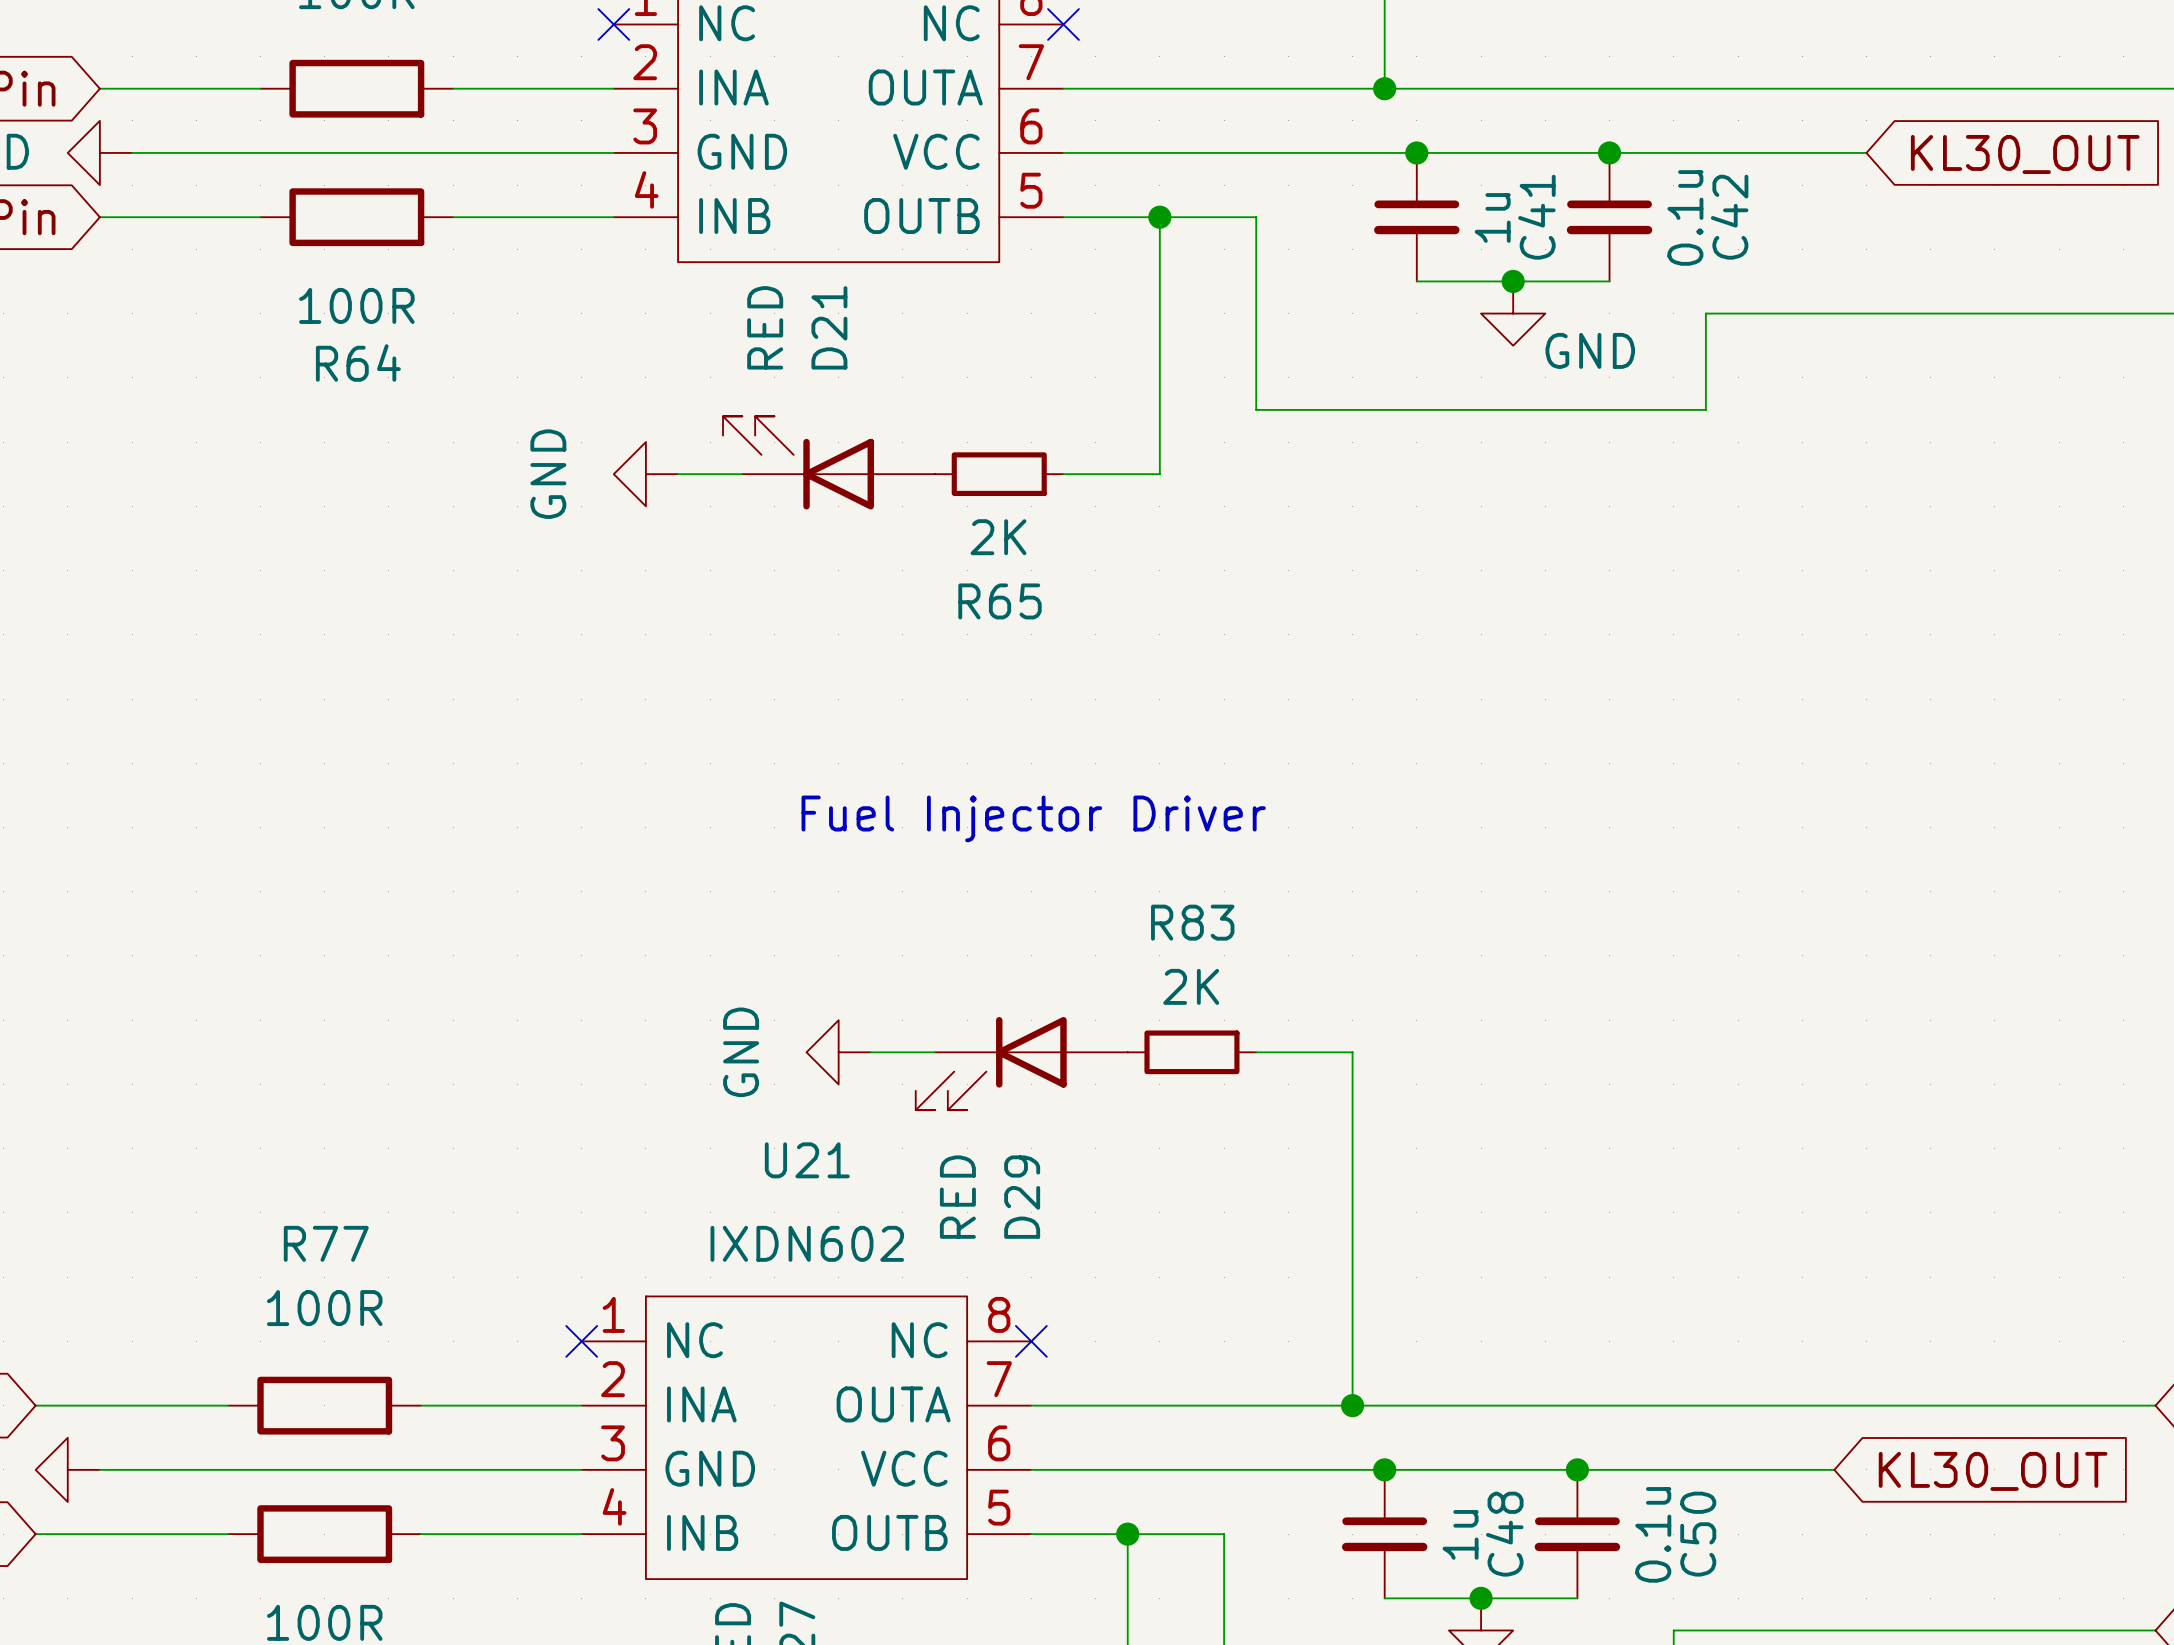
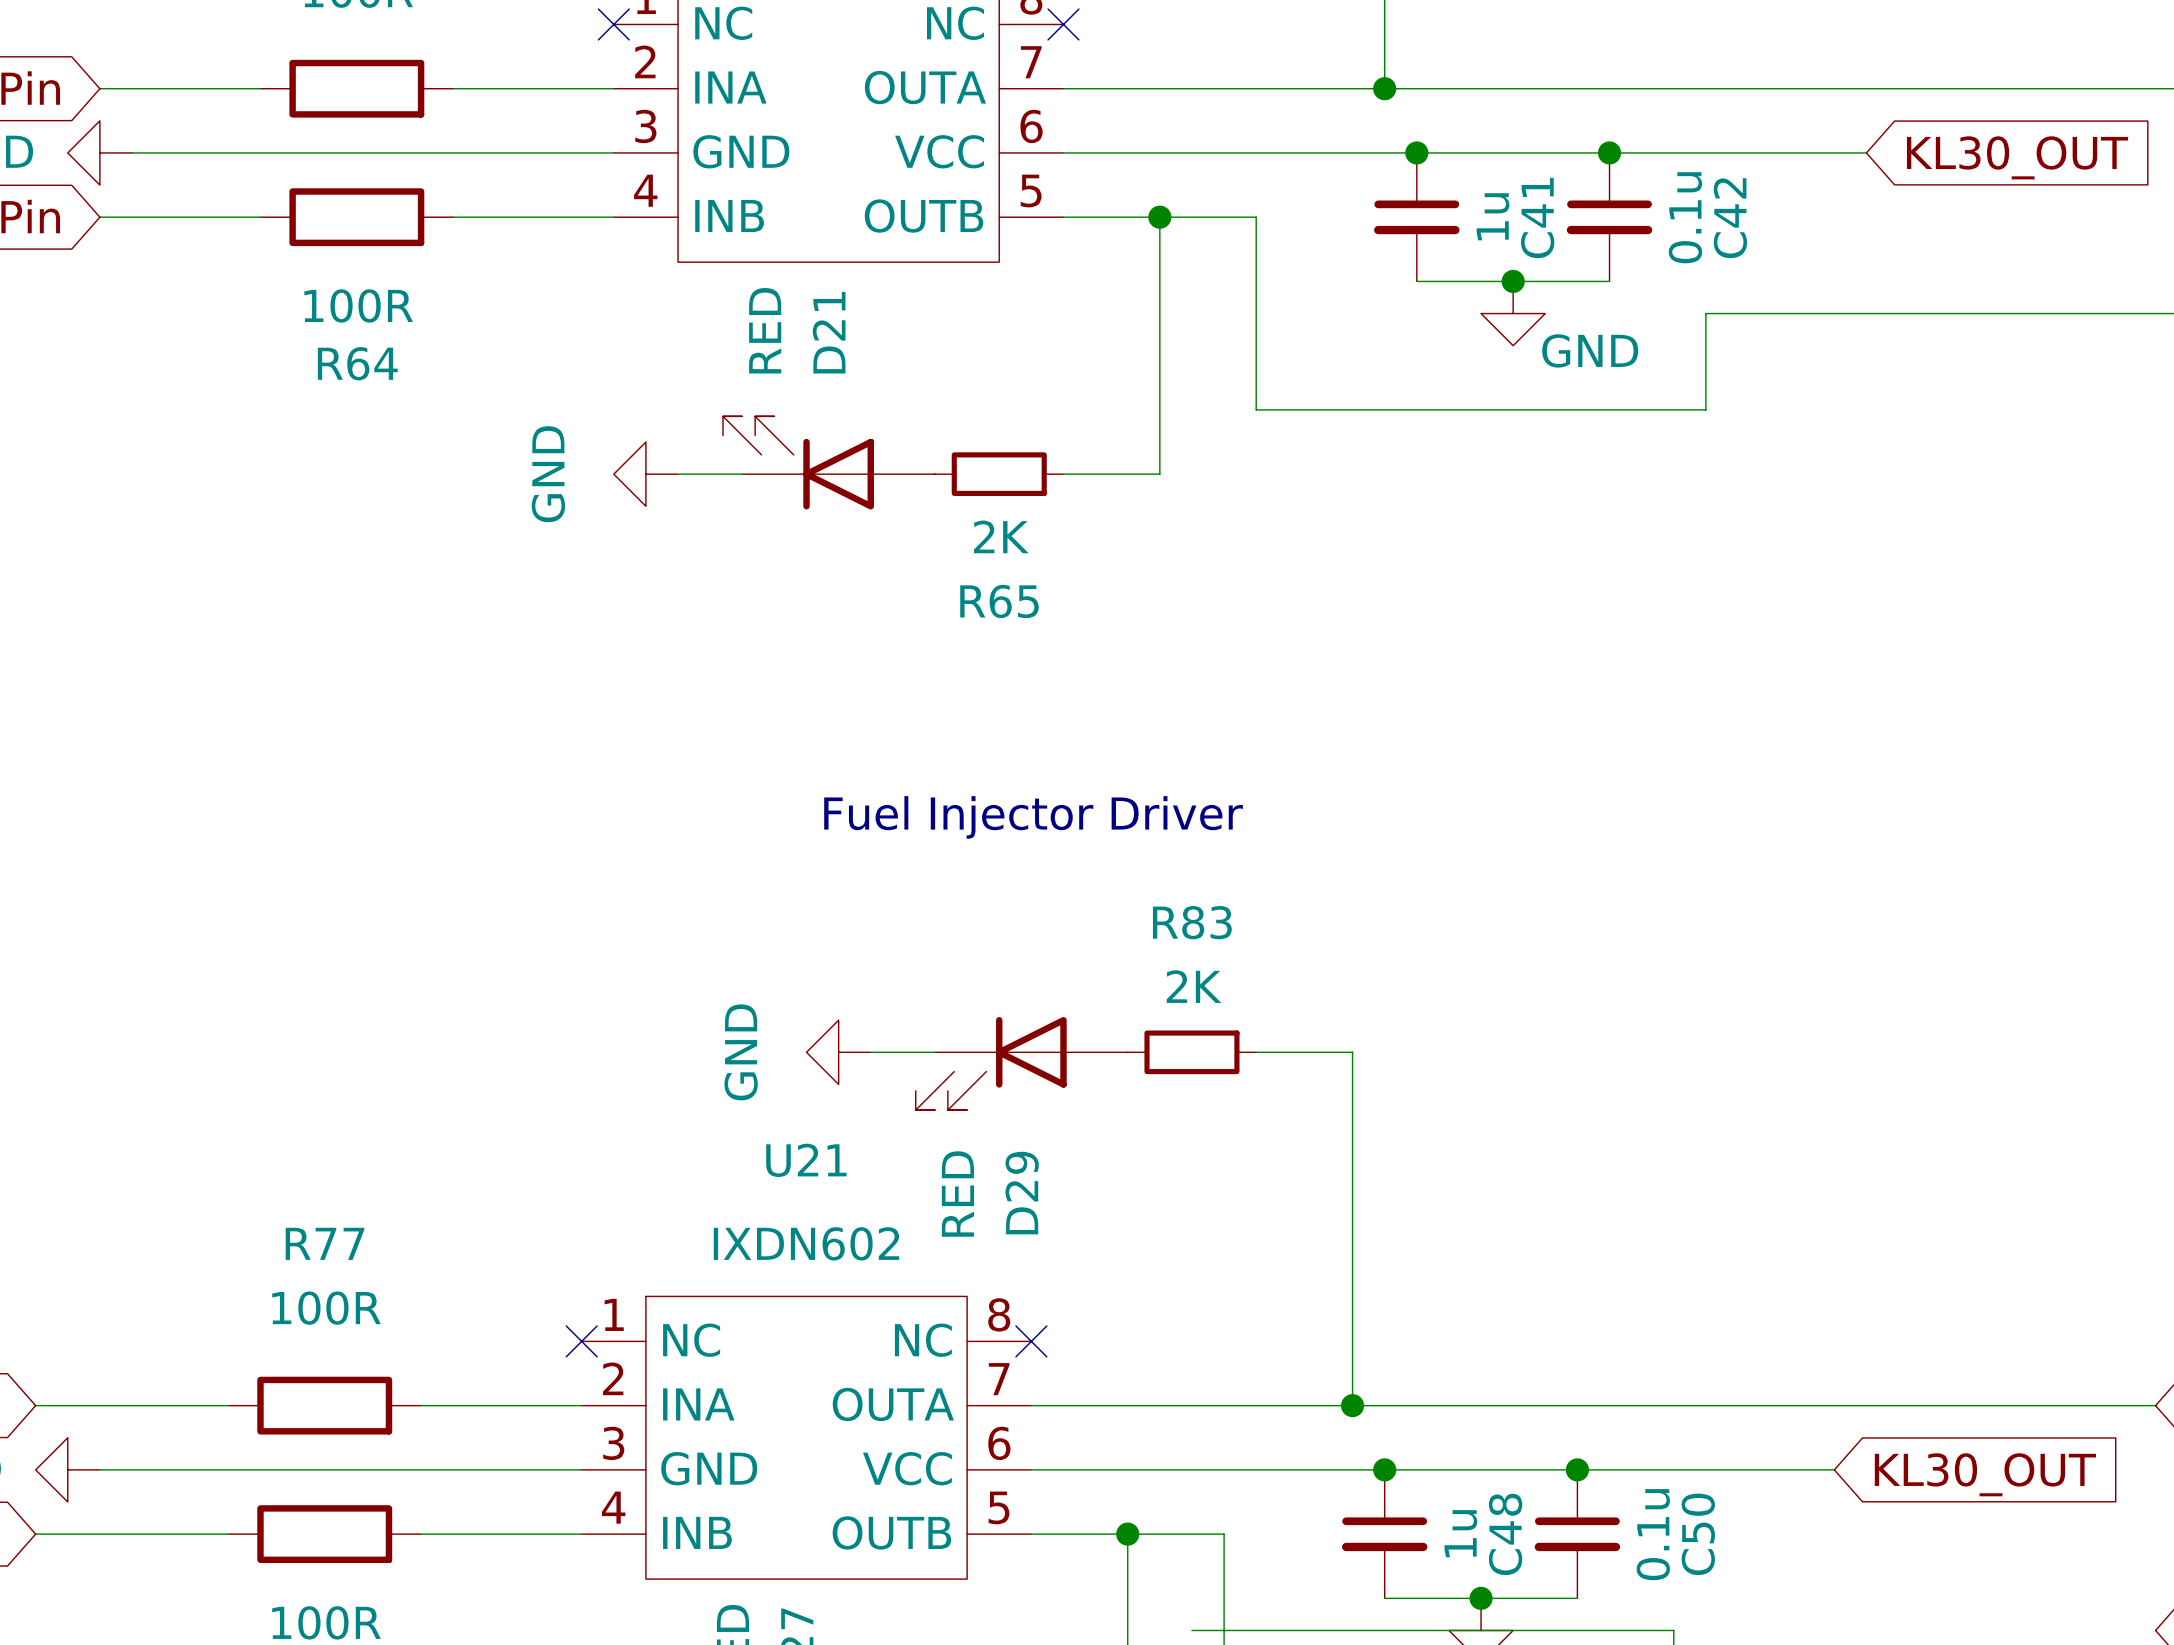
wire: (1673, 1630) (2155, 1630) -> (1673, 1630) (1191, 1630)

